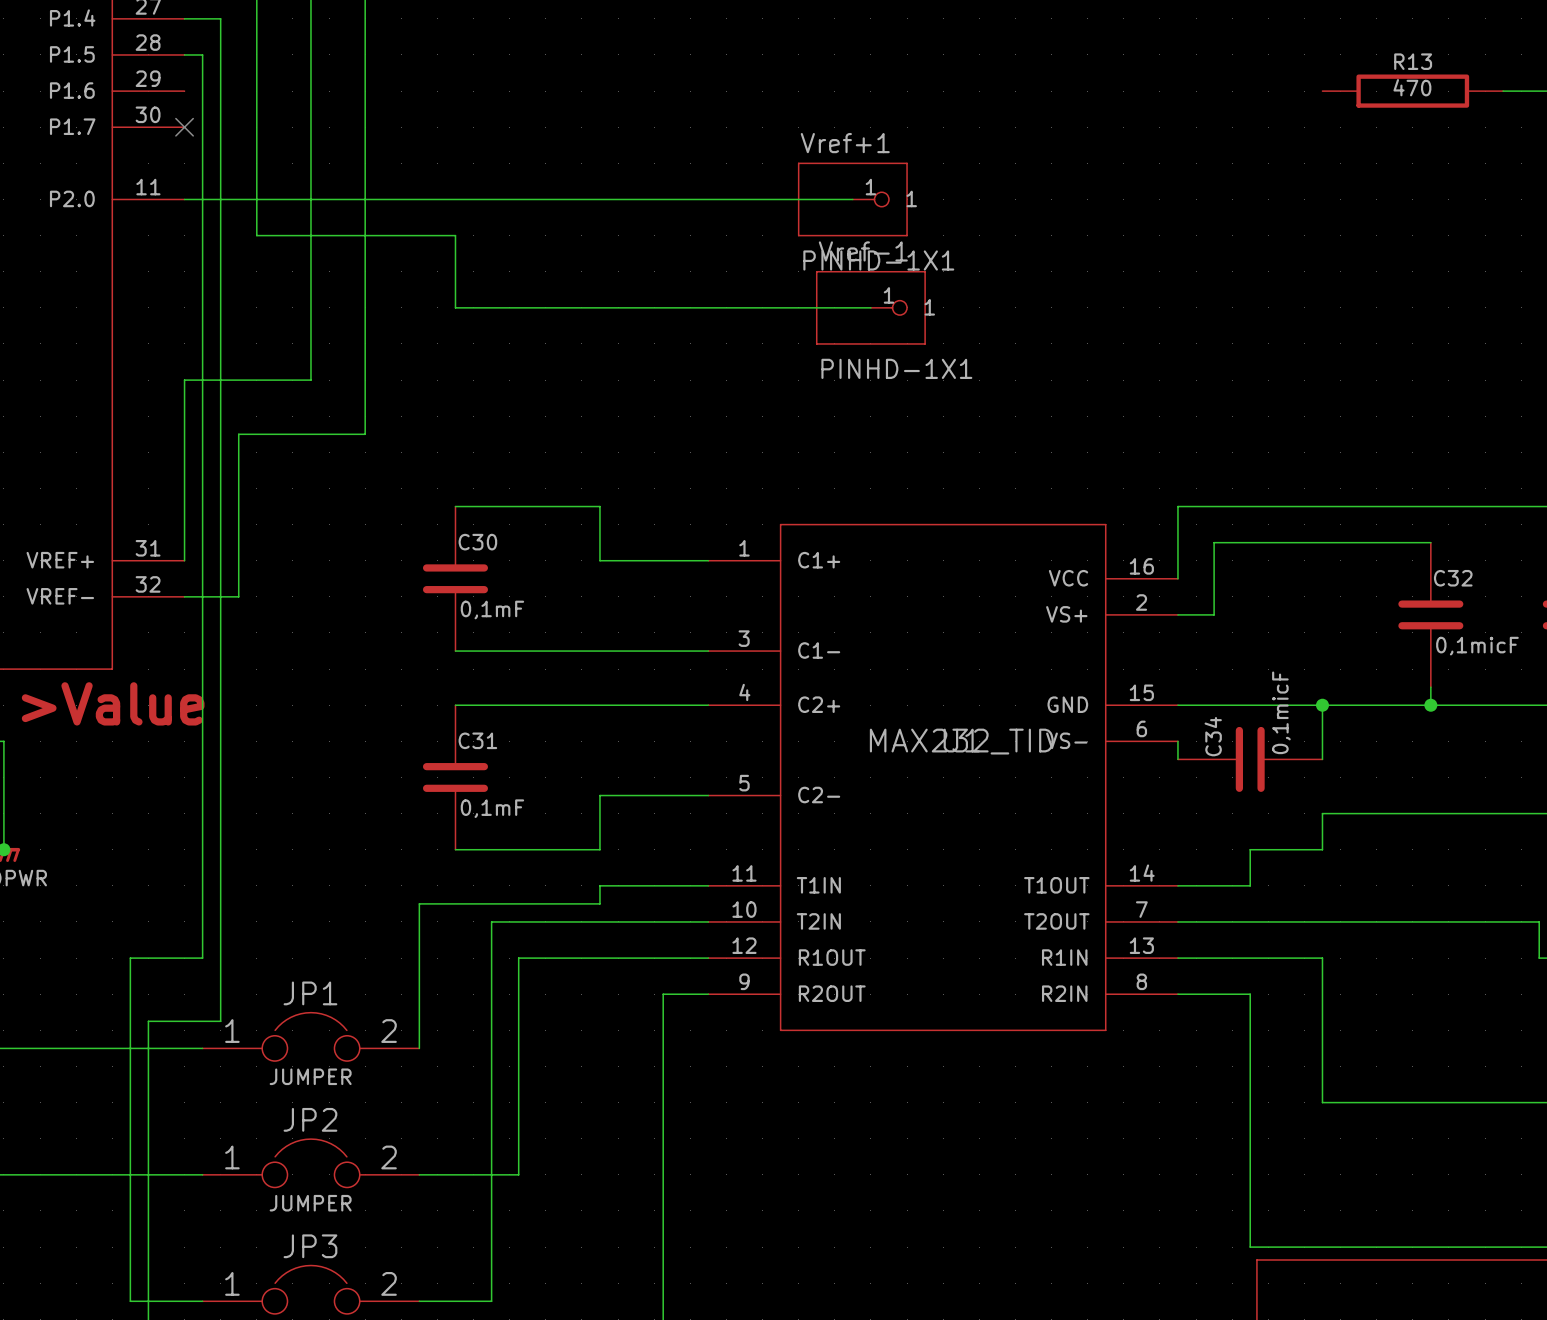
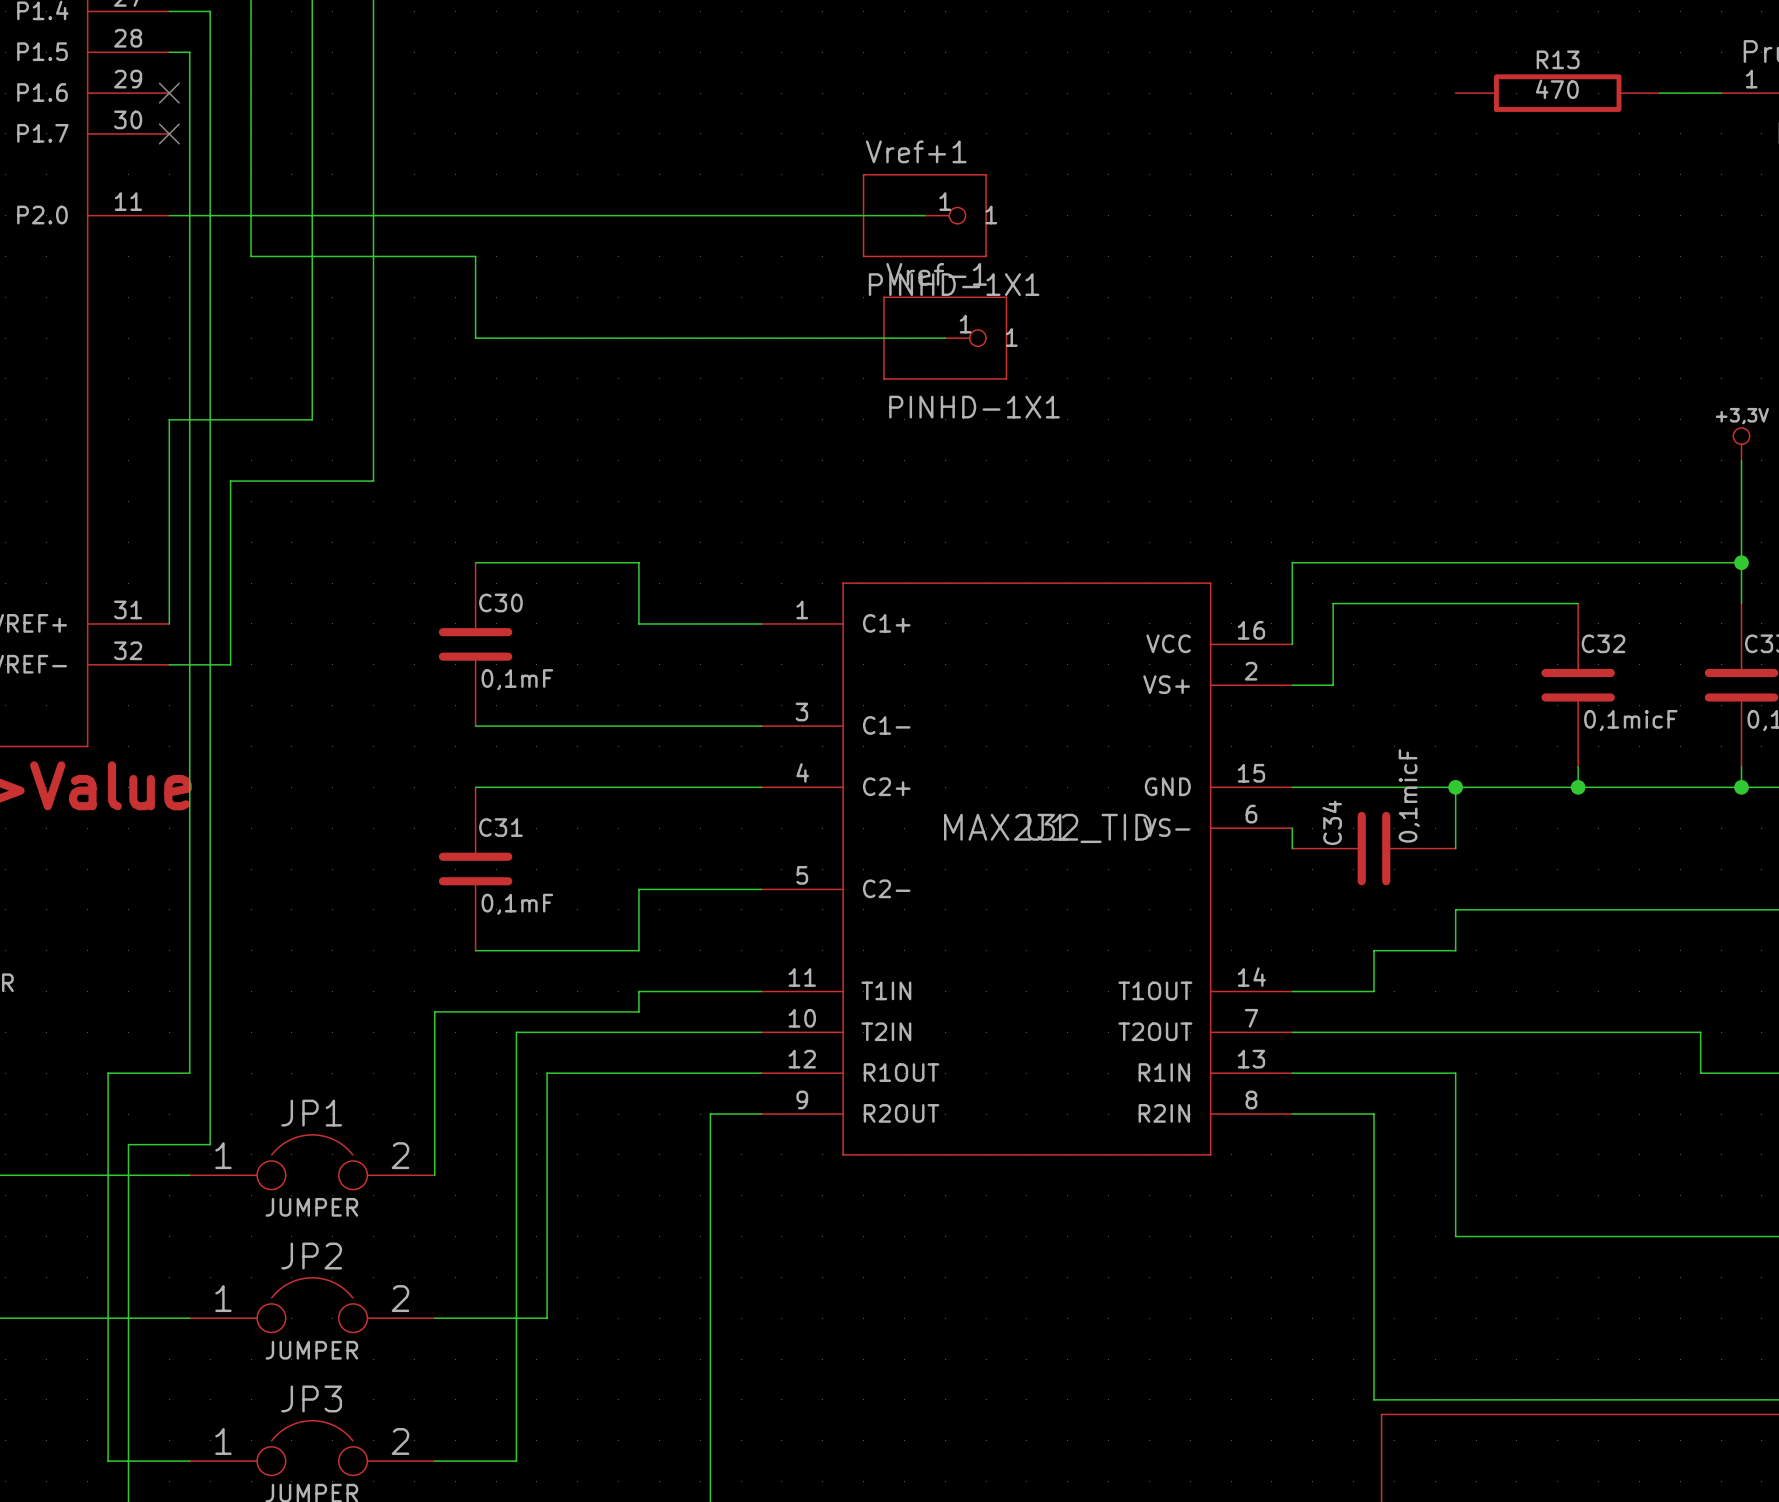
no-connect mark: none -> (169, 93)

